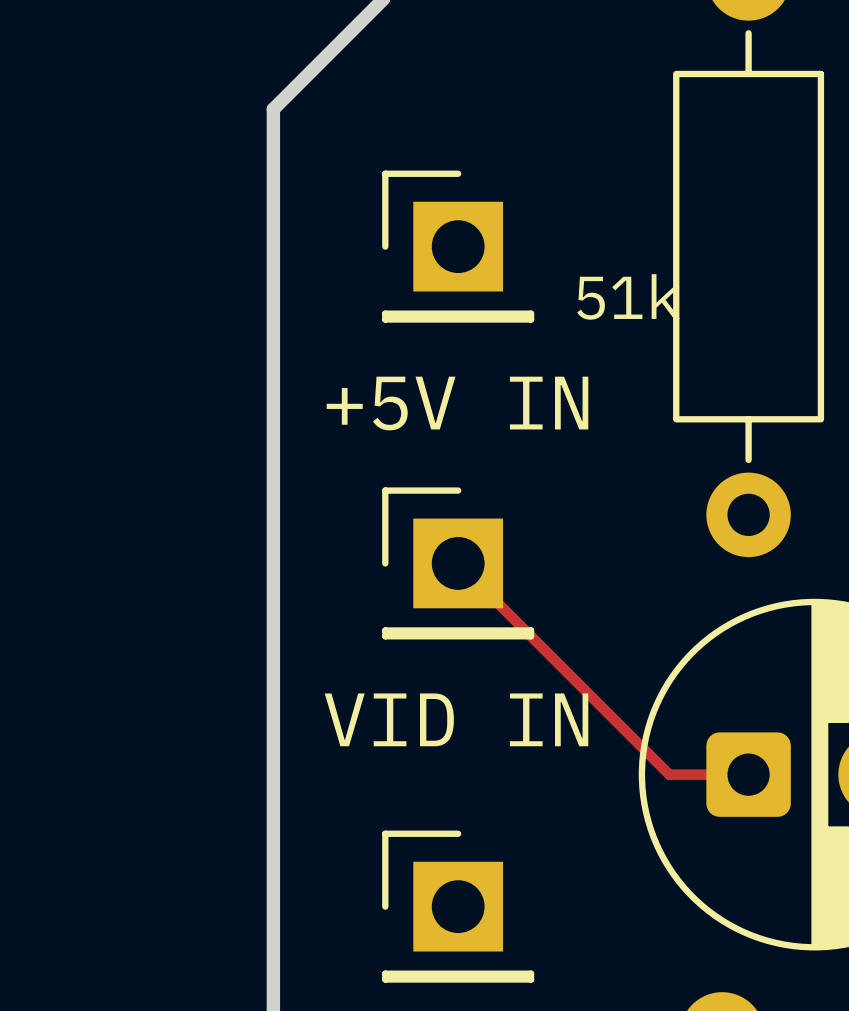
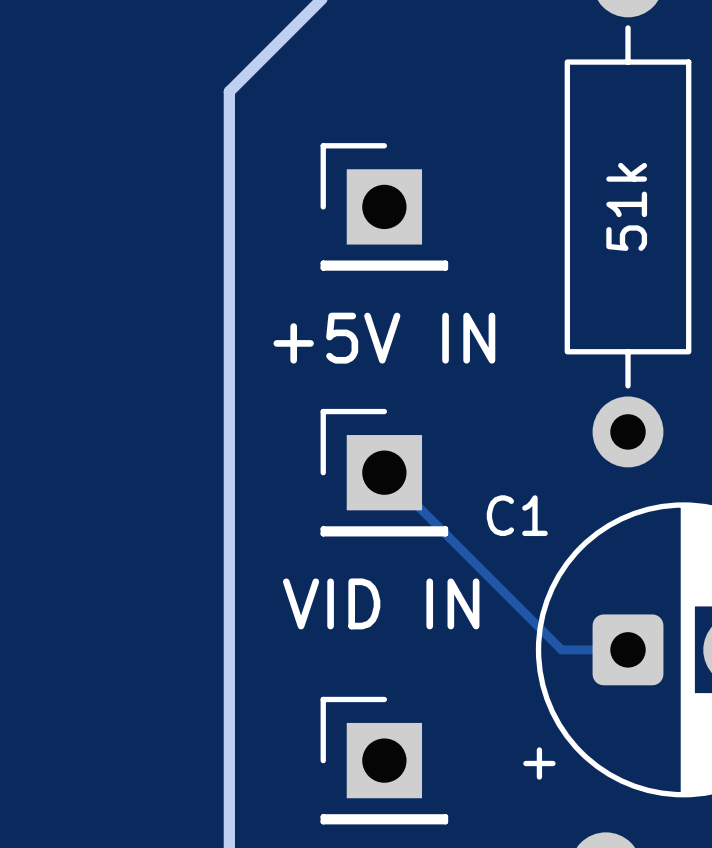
text rotation: 0° (628, 296) -> 90° counterclockwise (626, 206)
text: none -> C1 (517, 515)
text: none -> + (539, 763)

